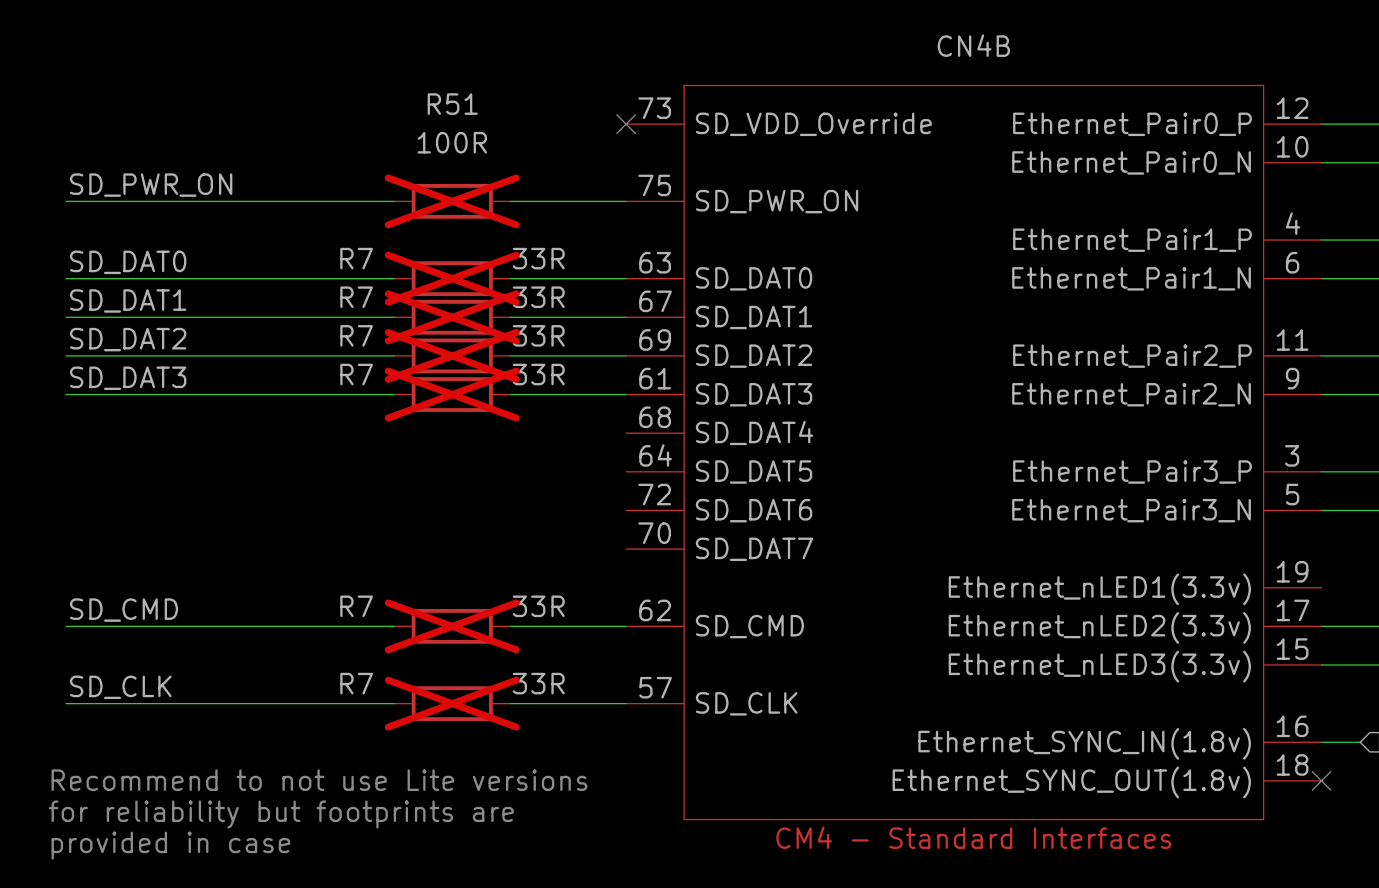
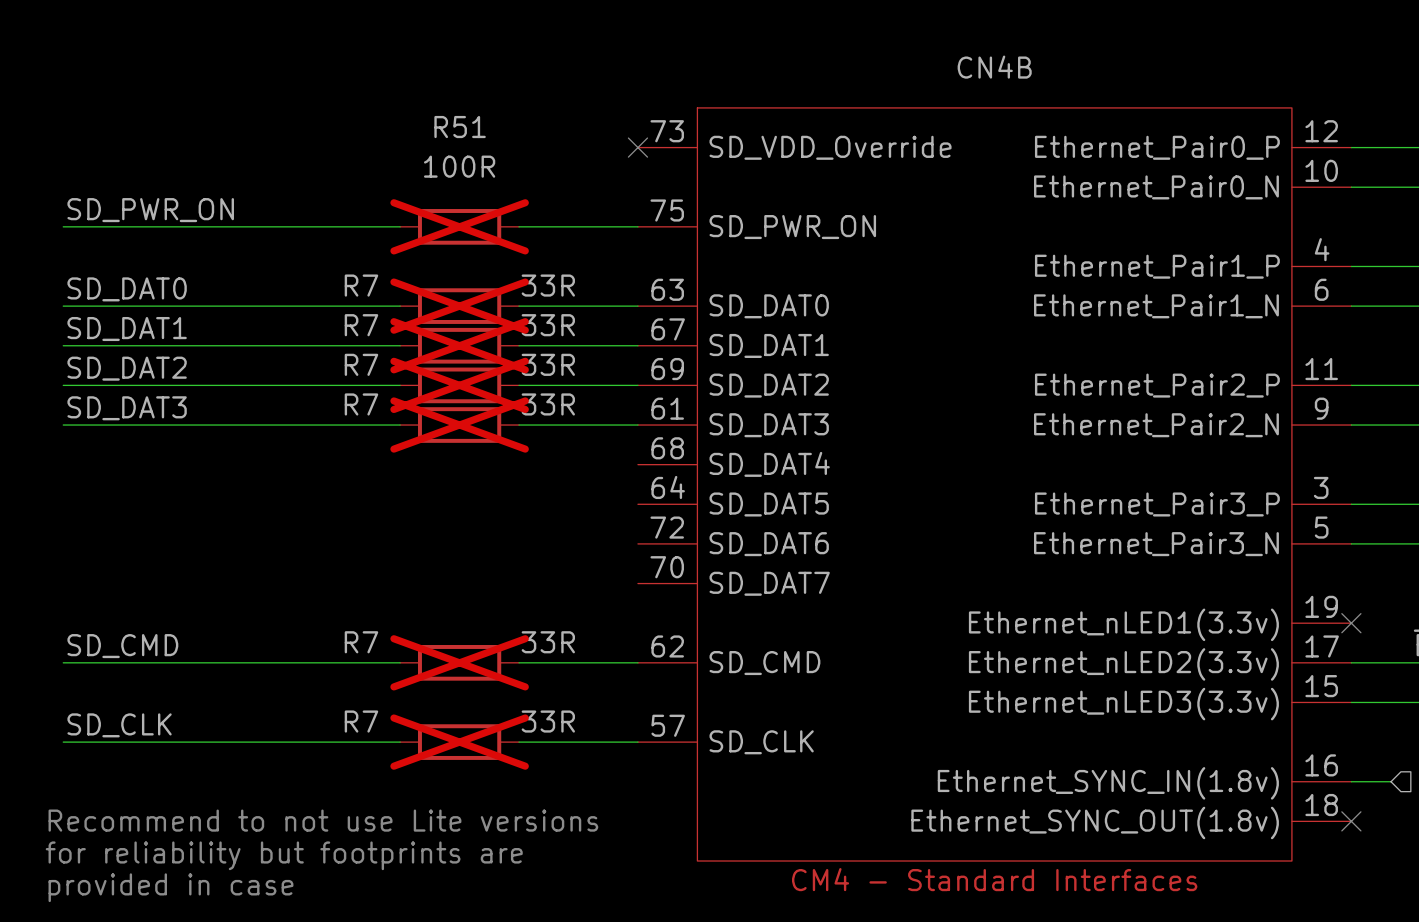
no-connect mark: none -> (1351, 623)

